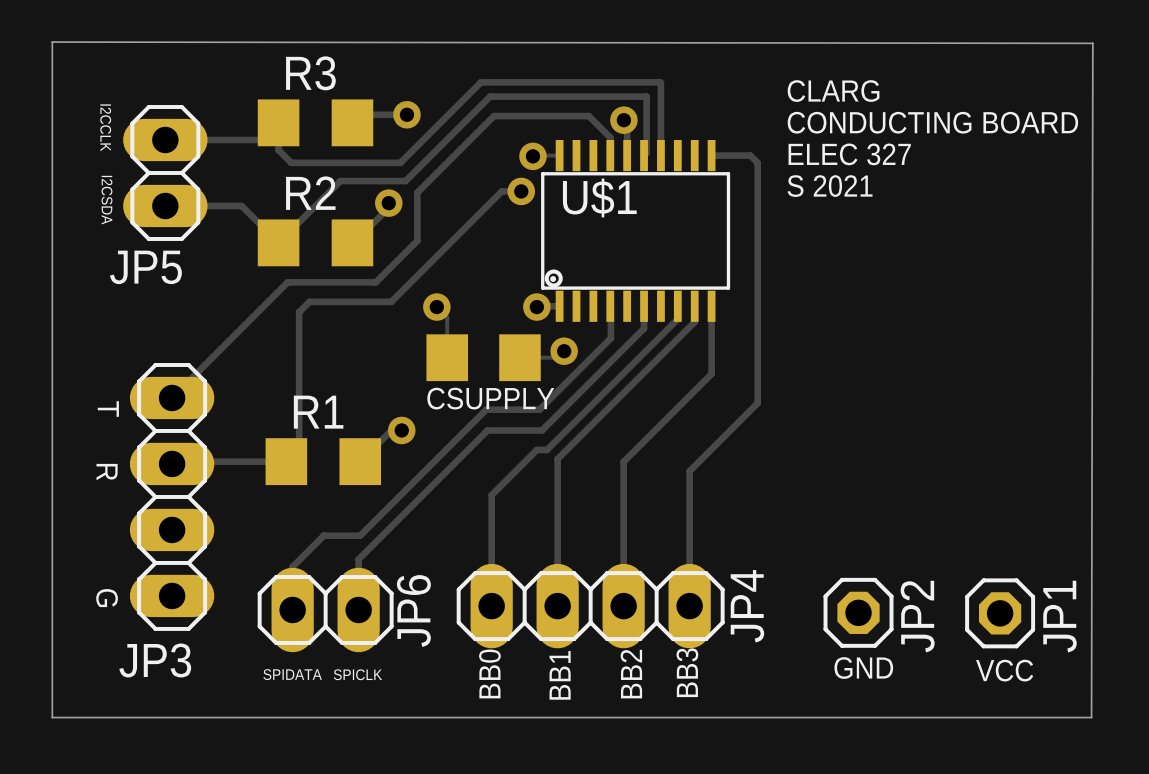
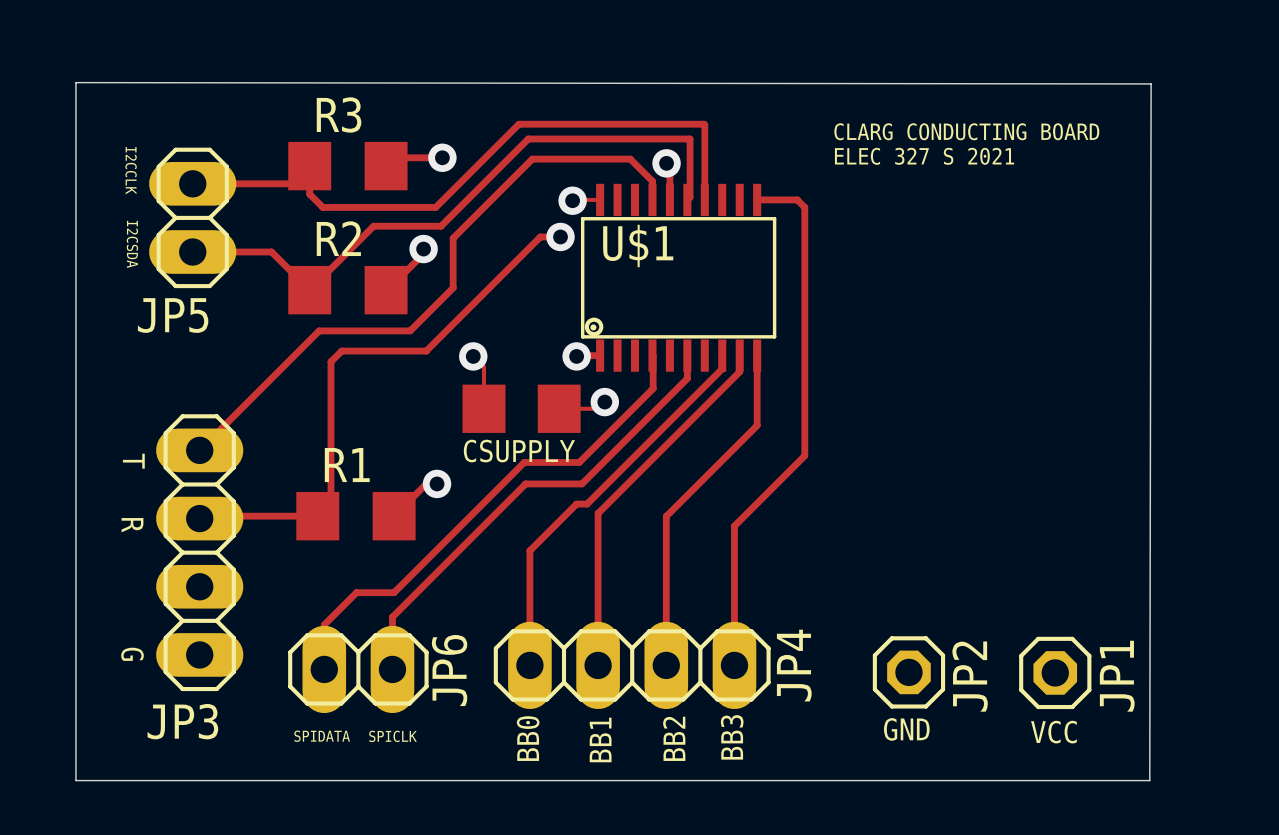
text: CLARG (833, 91) -> CLARG CONDUCTING BOARD (966, 131)
text: none -> ELEC 327 S 2021 (924, 156)
text: CONDUCTING BOARD (932, 122) -> none
text: ELEC 327 (849, 154) -> none
text: S 2021 (830, 186) -> none

